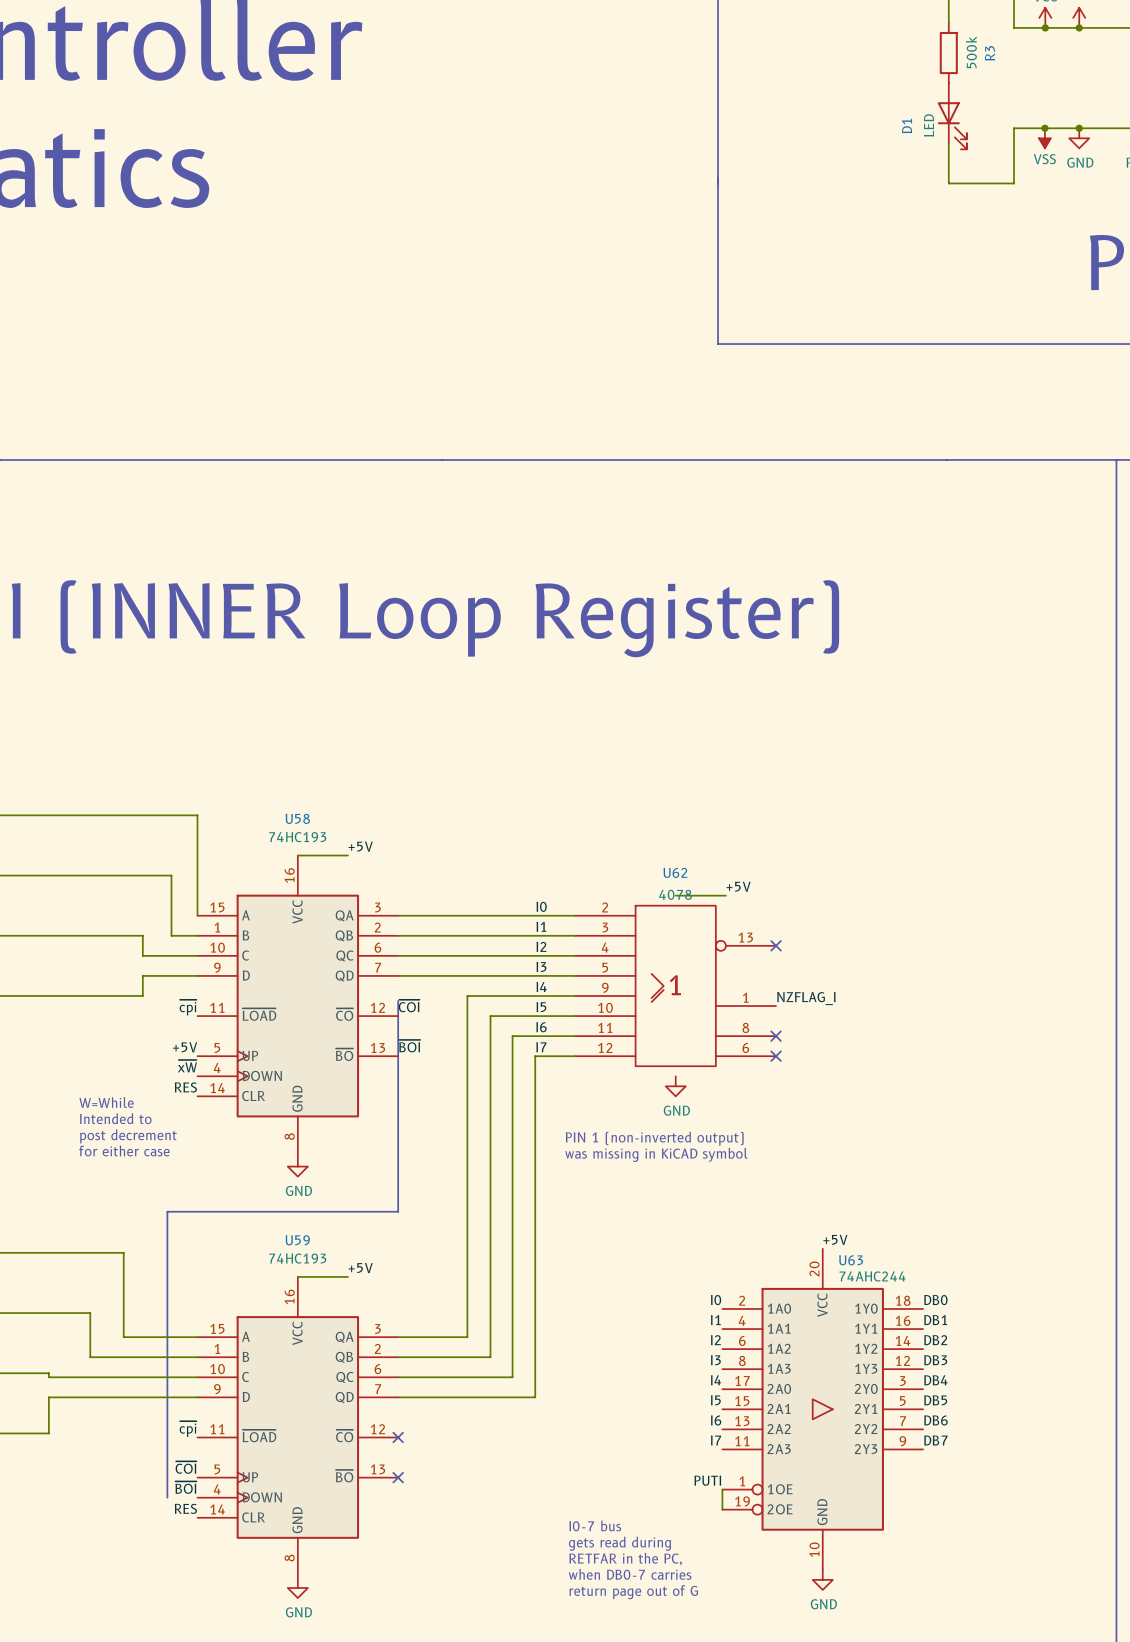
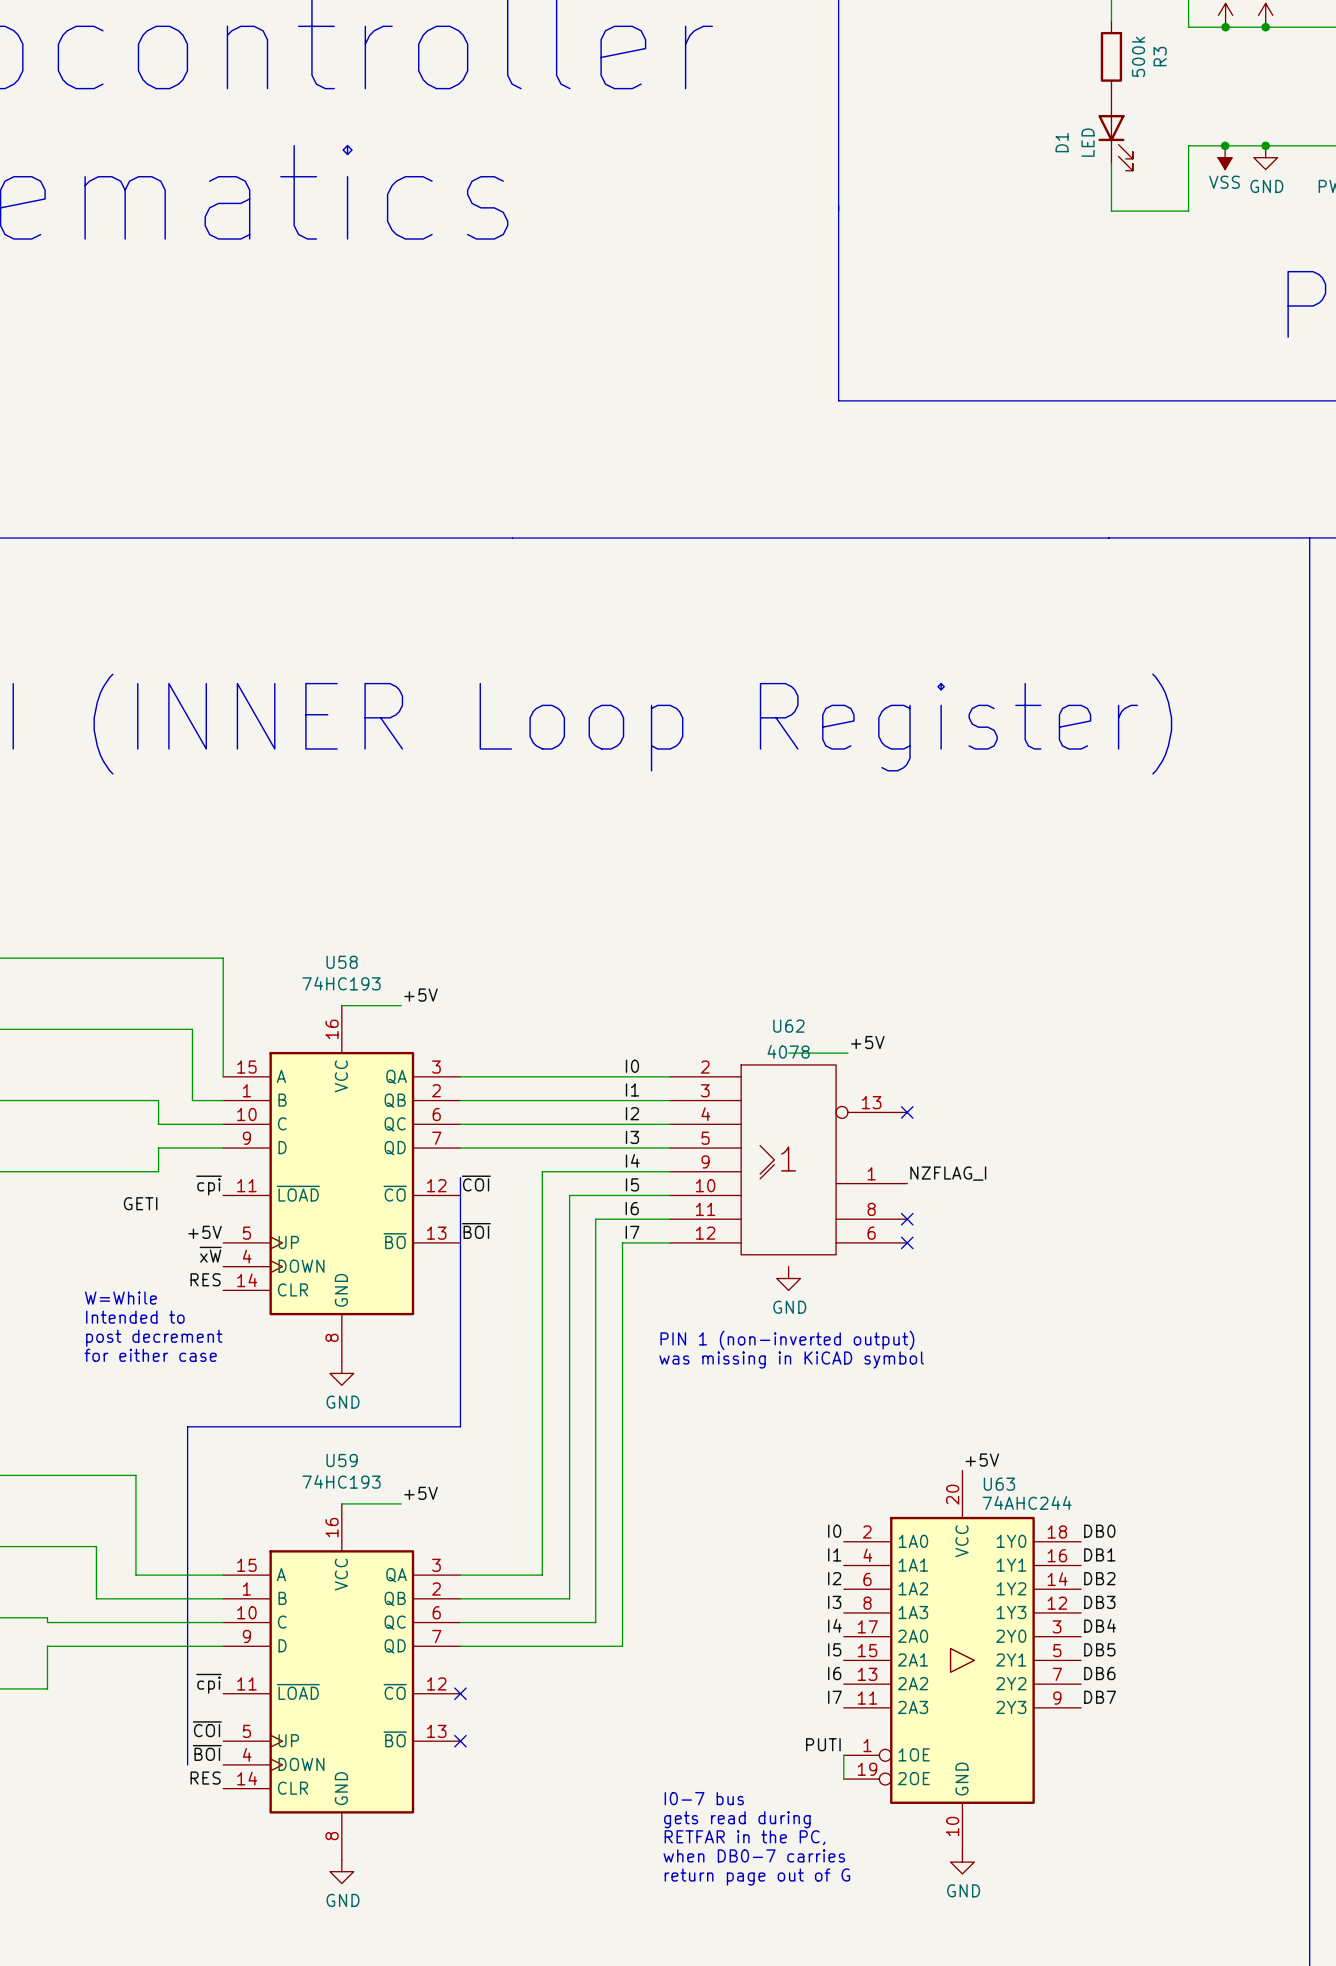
label: none -> GETI (140, 1203)

